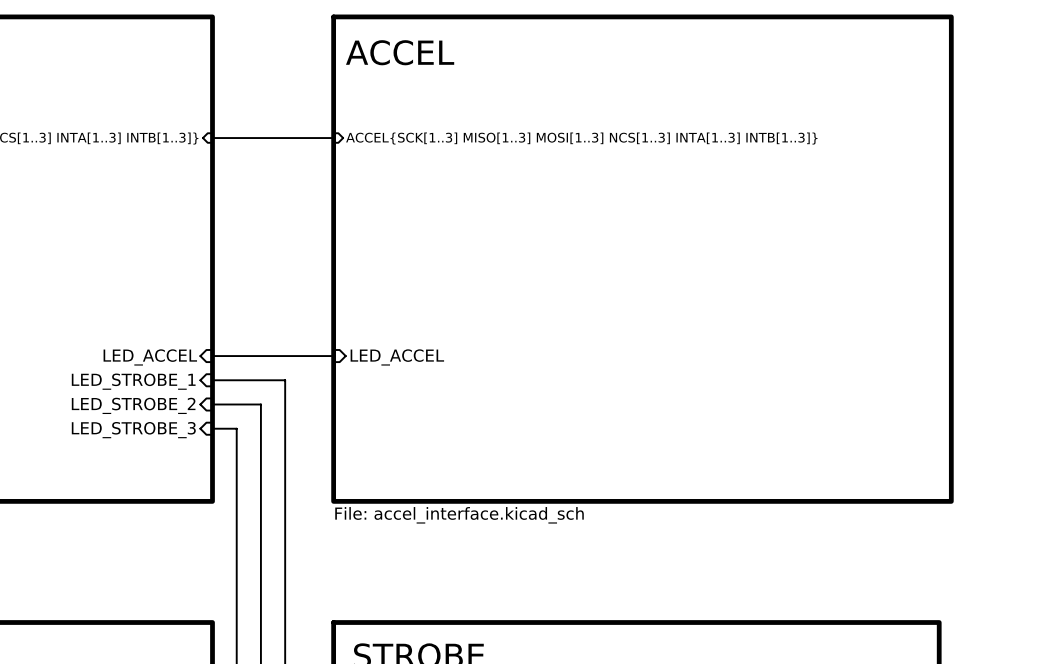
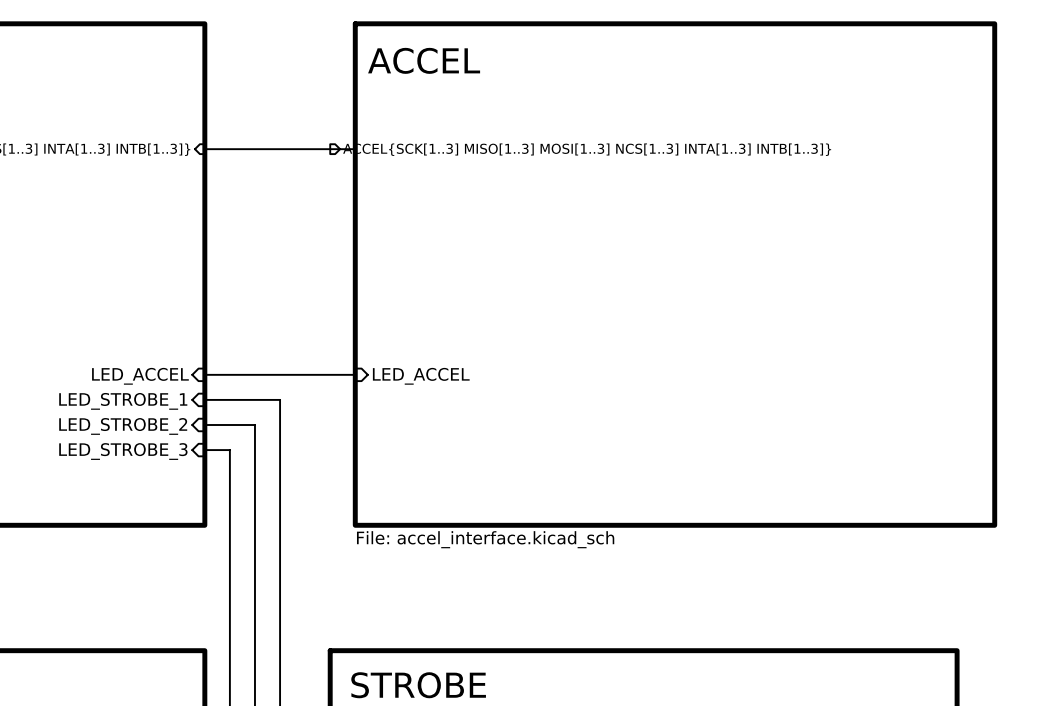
bus: none -> (330, 149) (355, 149)
sheet ACCEL position: (642, 259) -> (675, 274)
wire: none -> (330, 374) (355, 374)
sheet pin position: LED_ACCEL (397, 357) -> LED_ACCEL (421, 376)

